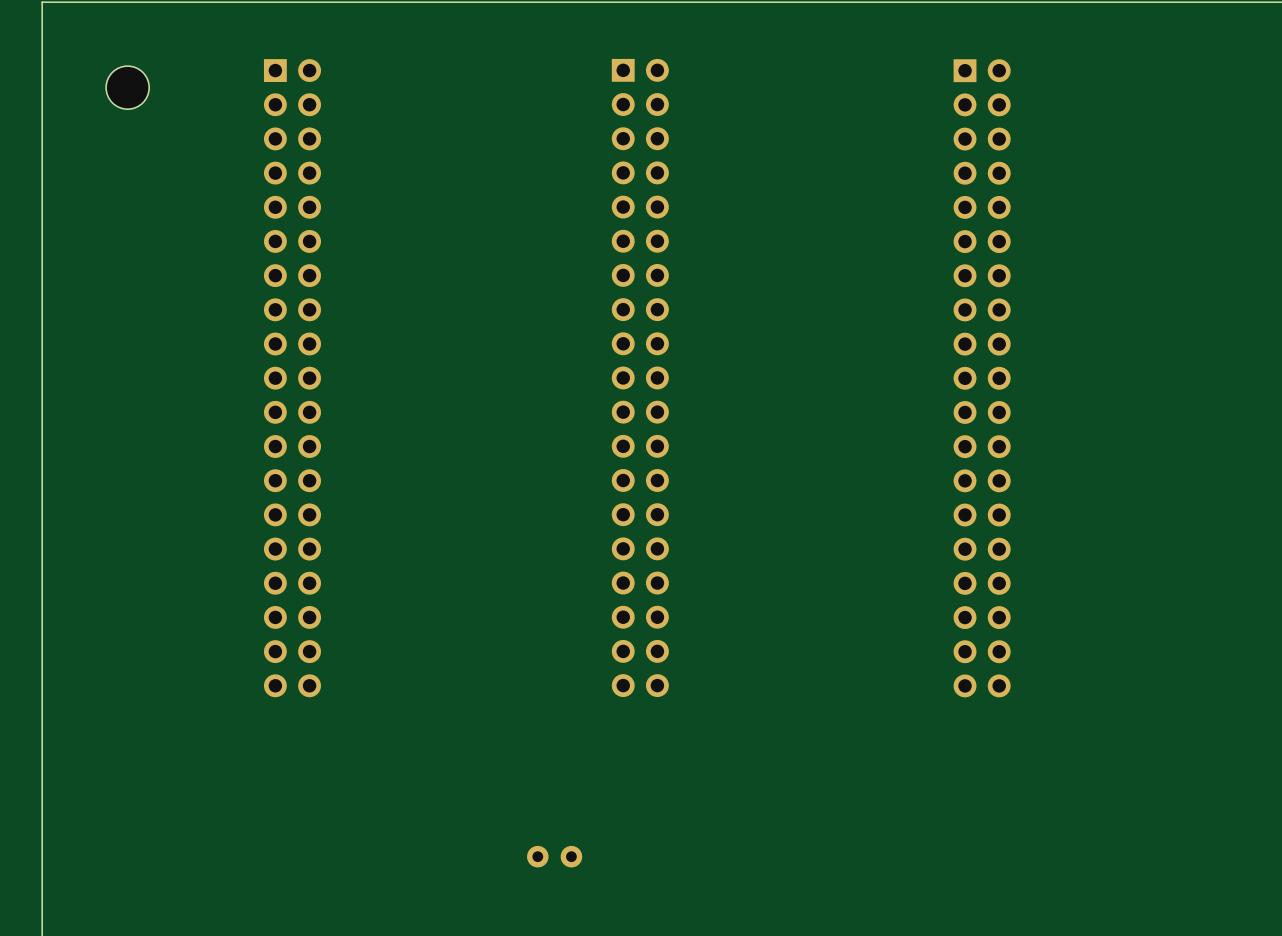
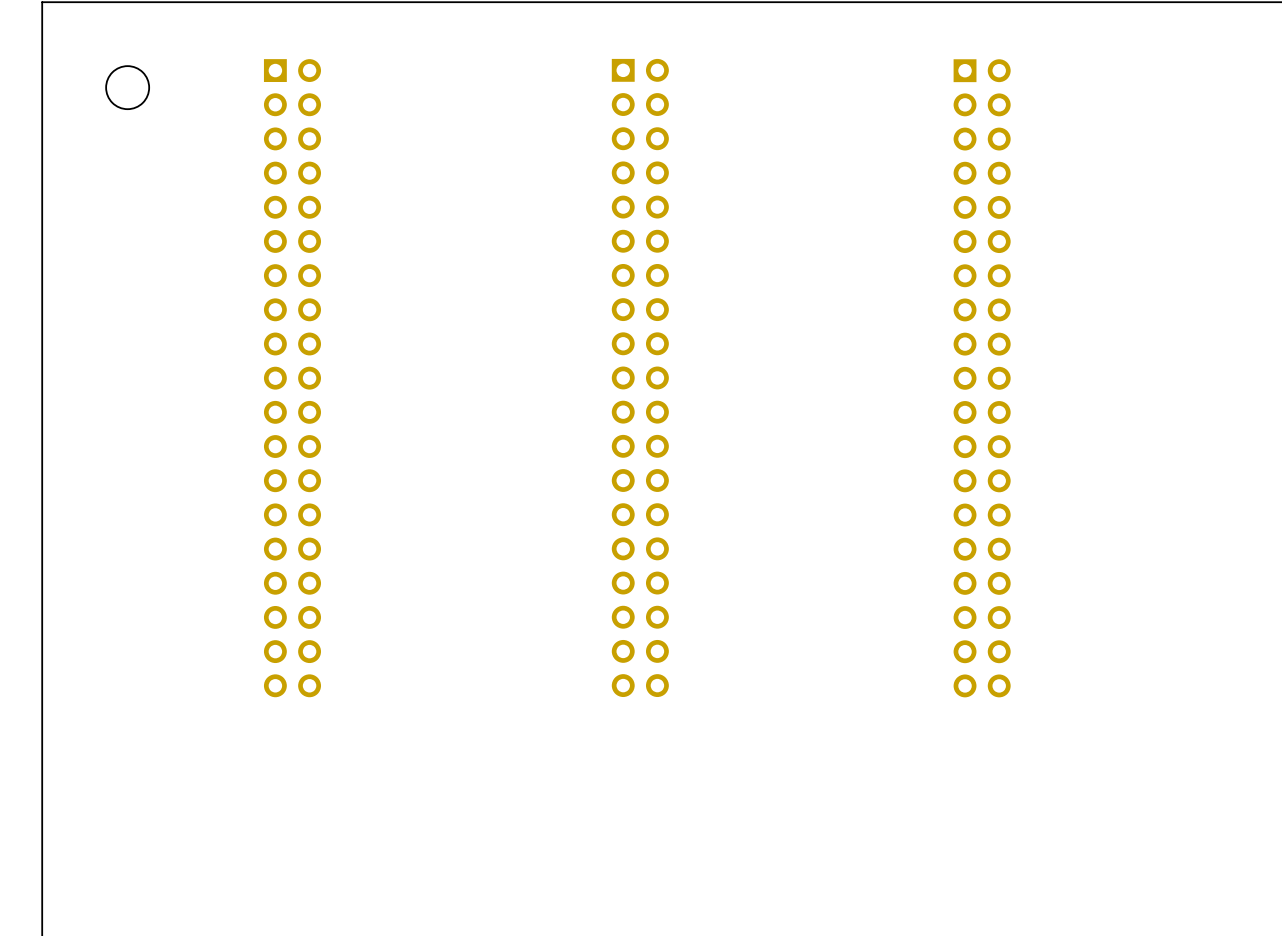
part: (554, 856) -> none

